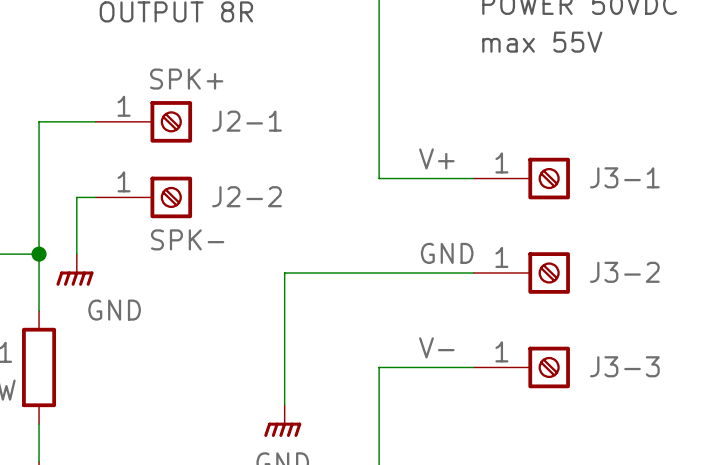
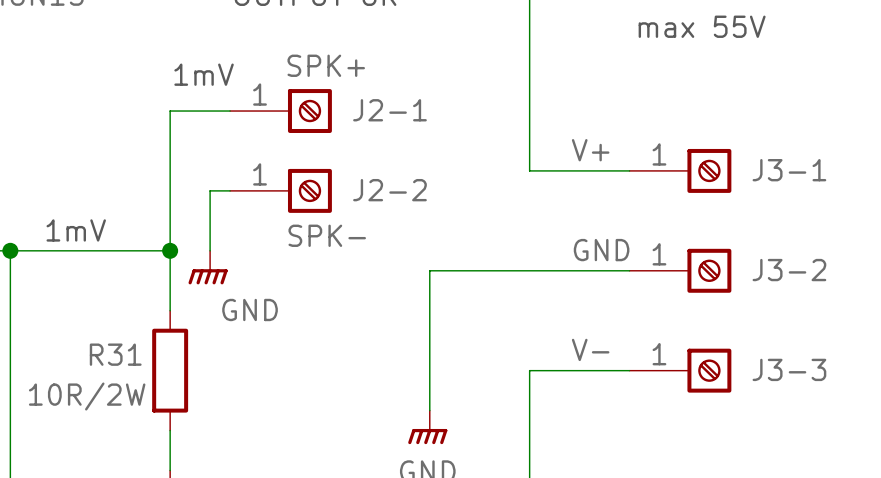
text: none -> 1mV (204, 74)

